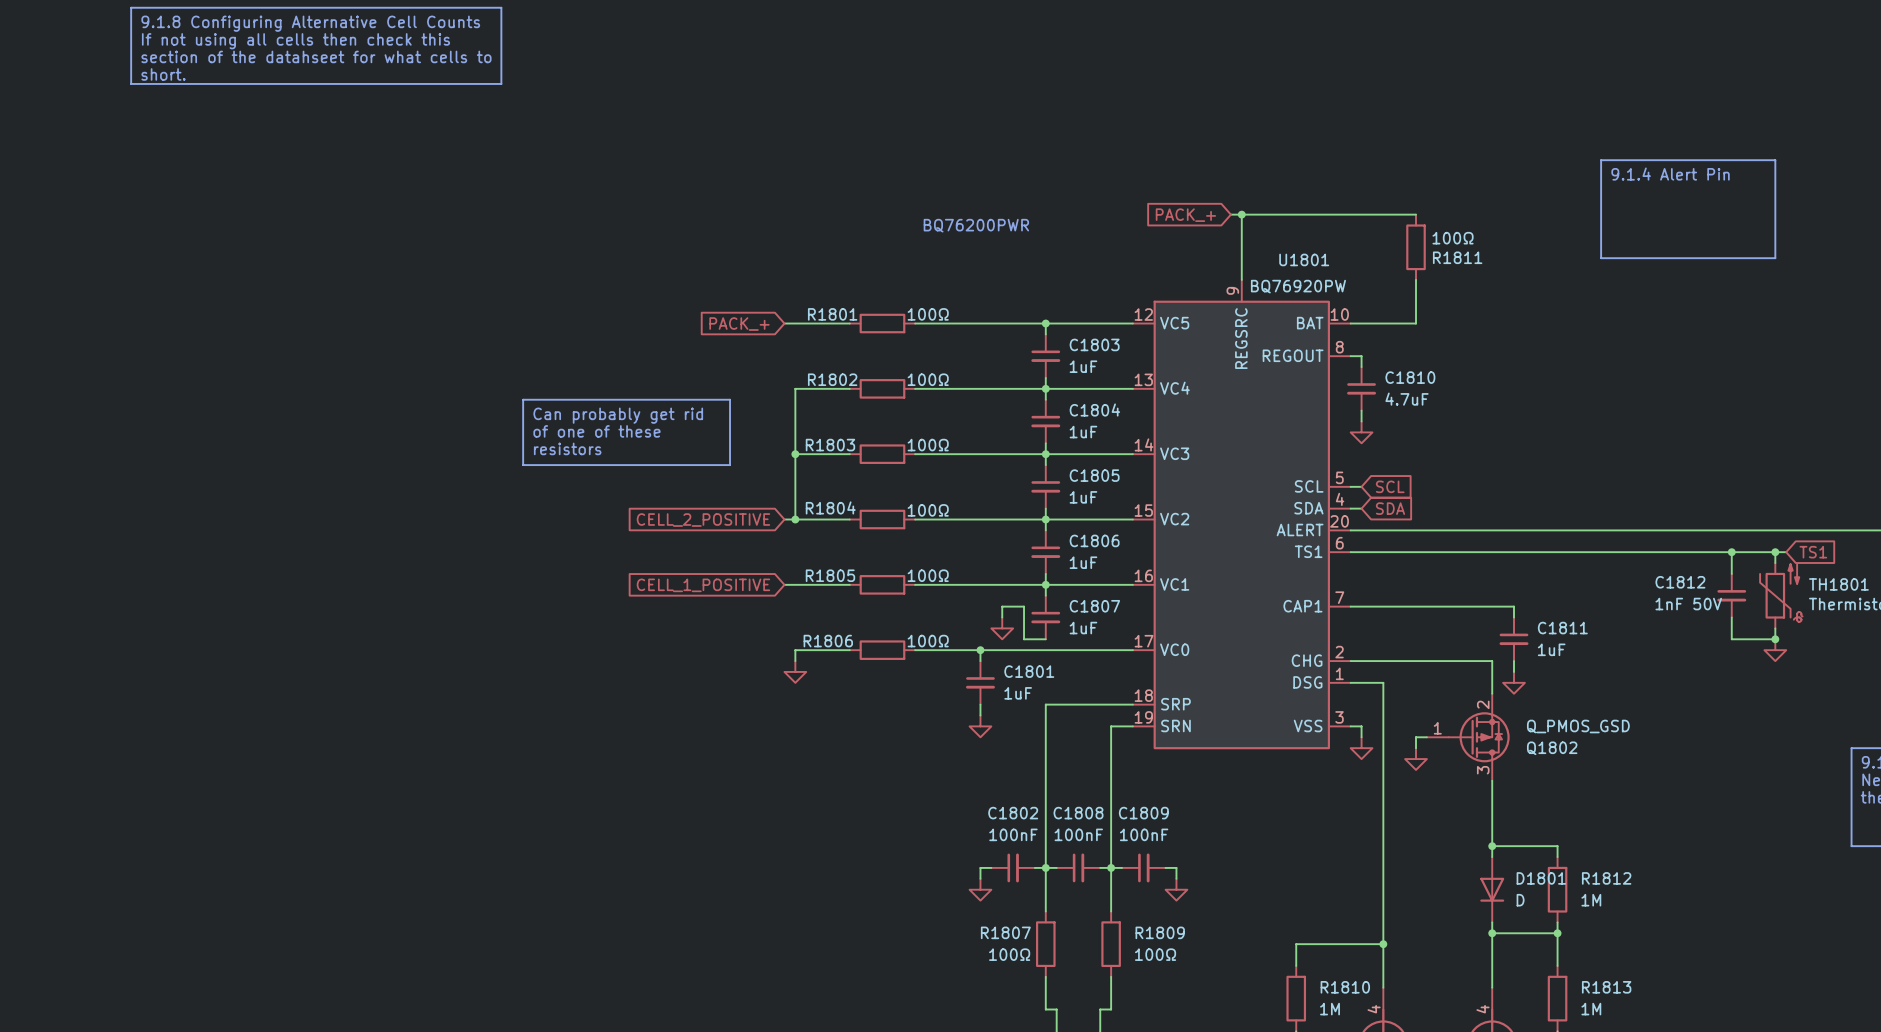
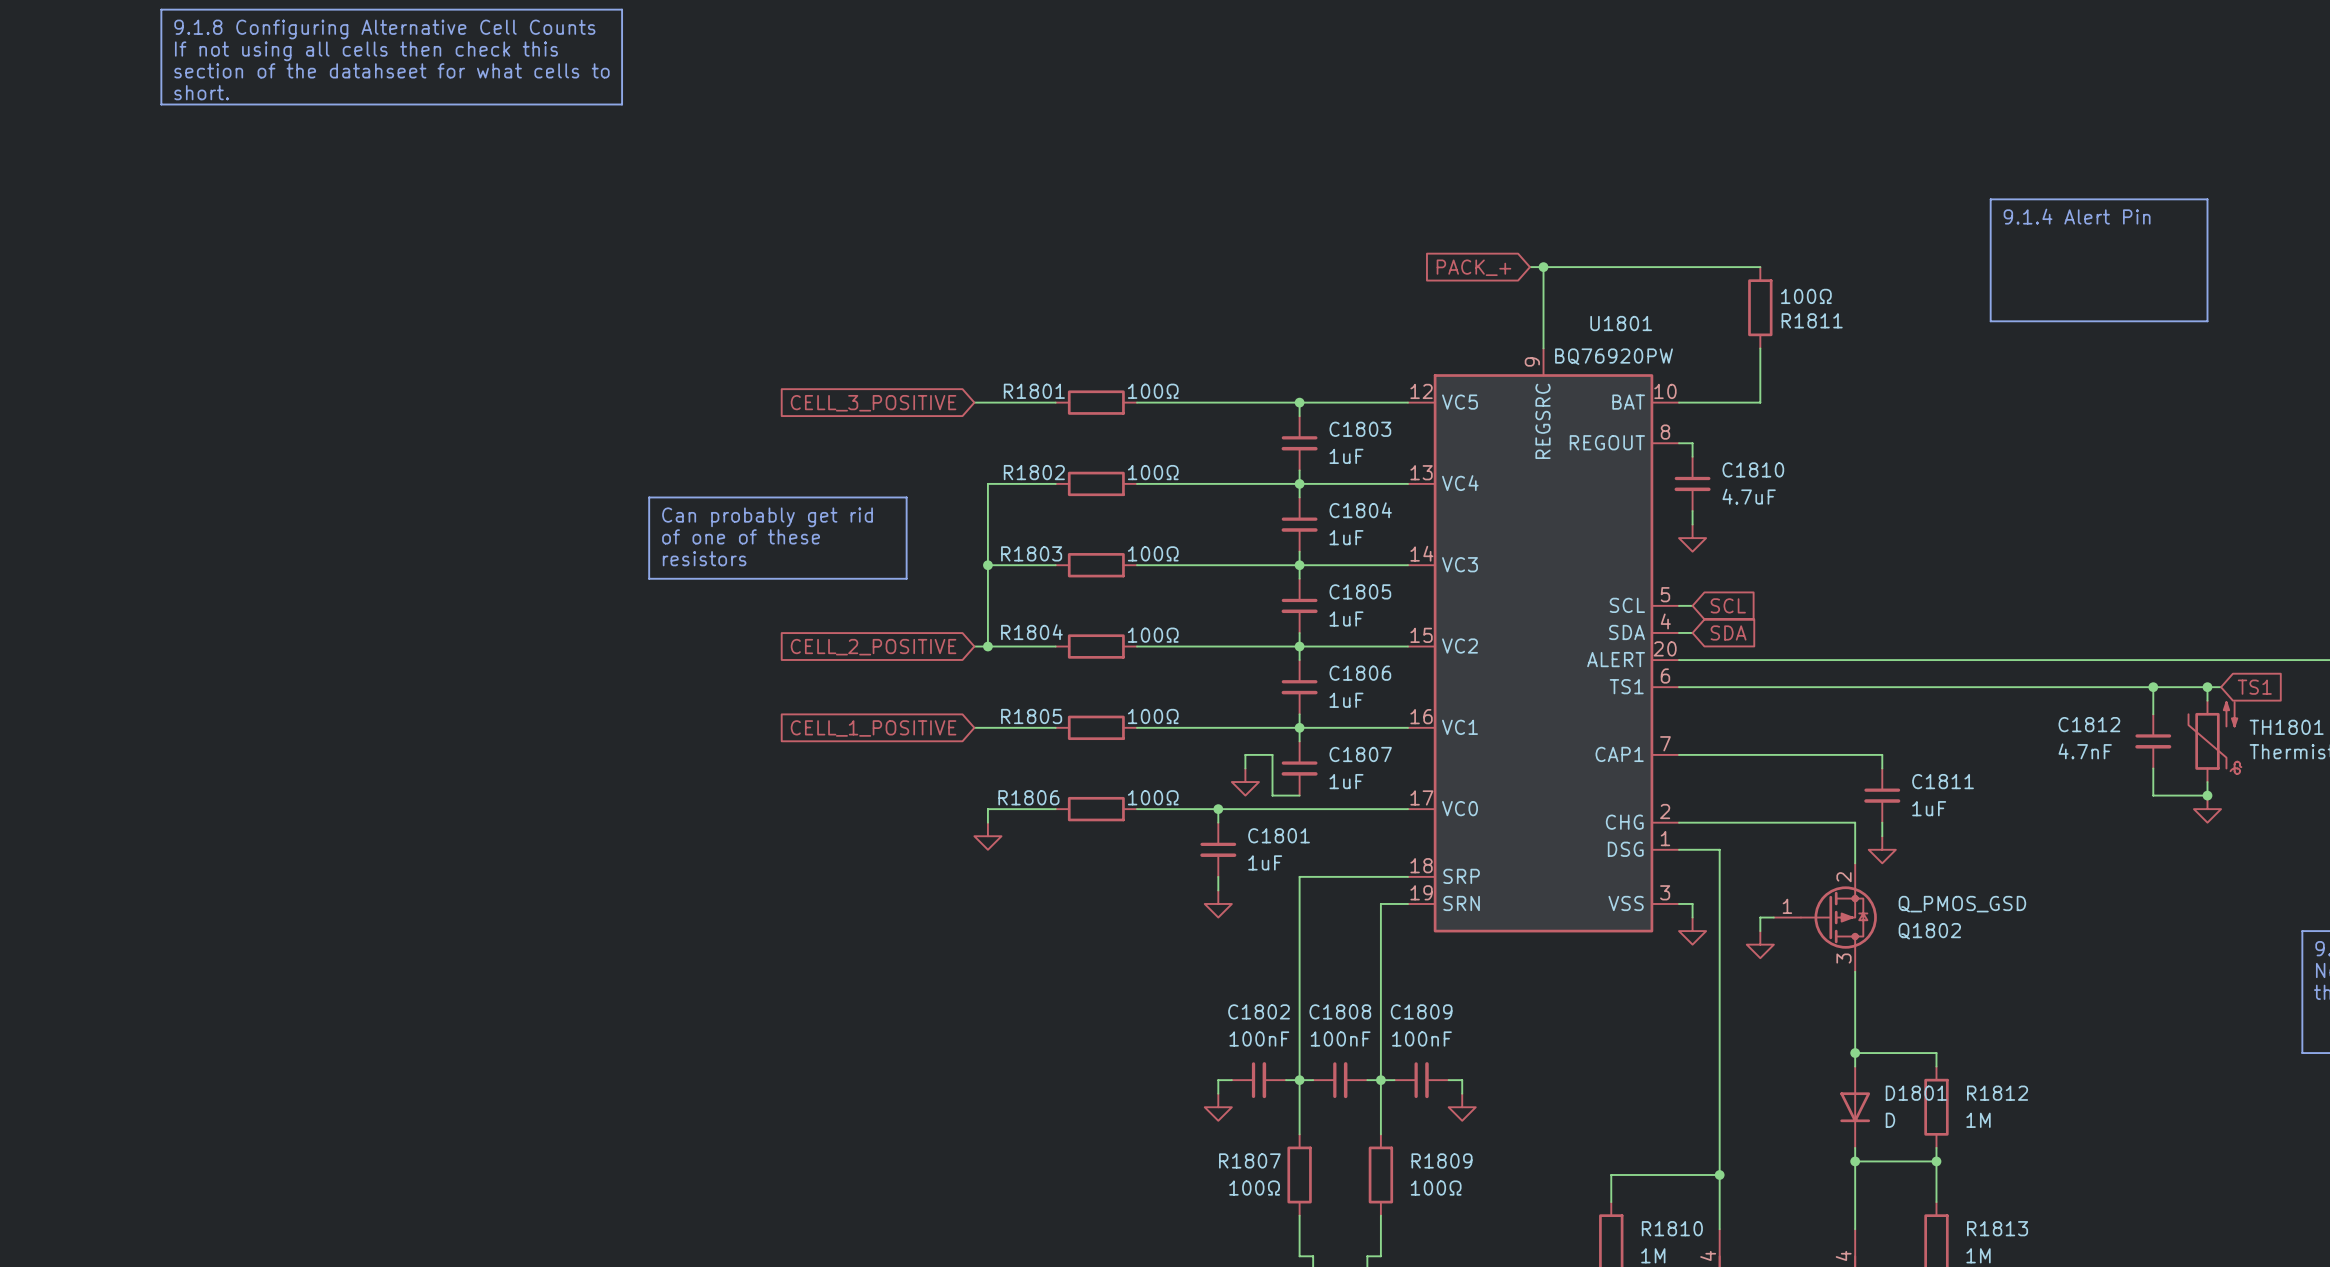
text: BQ76200PWR (976, 225) -> none
global label: PACK_+ (739, 324) -> CELL_3_POSITIVE (873, 403)
C1812 value: 1nF 50V (1688, 604) -> 4.7nF (2085, 751)

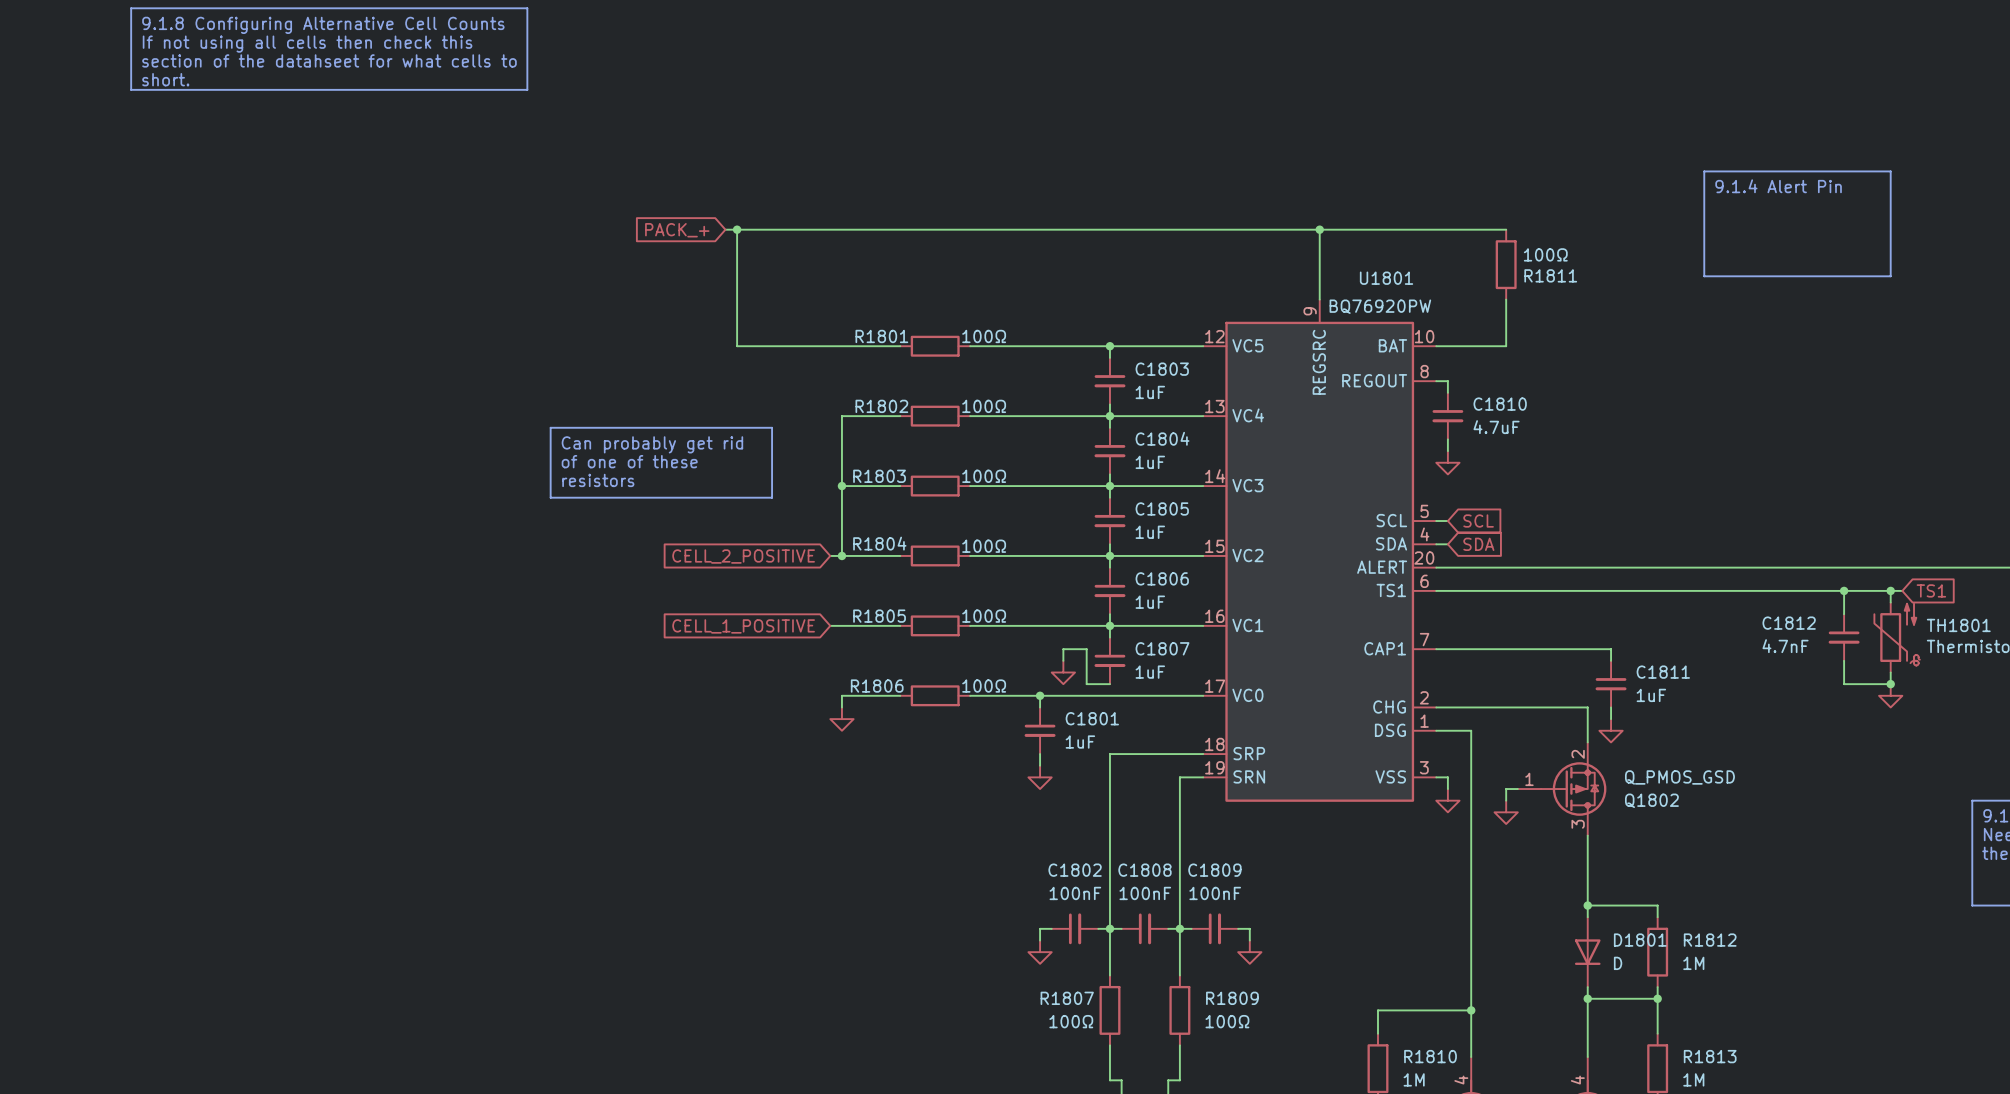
global label: none -> PACK_+ (677, 230)
wire: none -> (725, 229) (1308, 229)
wire: none -> (737, 229) (737, 346) (830, 346)
junction: none -> (737, 229)
global label: PACK_+ (1473, 267) -> none
global label: CELL_3_POSITIVE (873, 403) -> none

